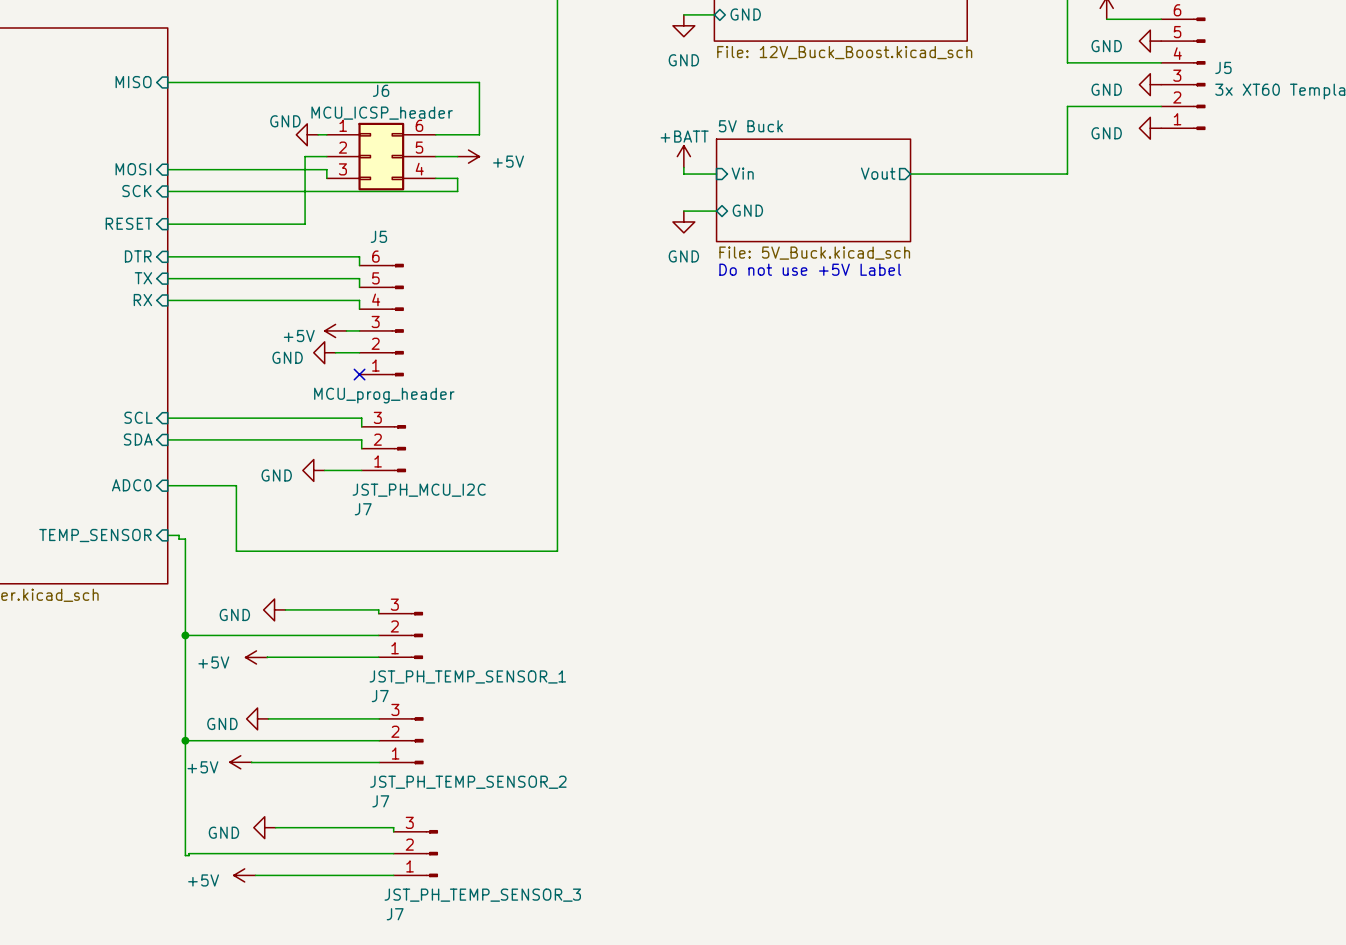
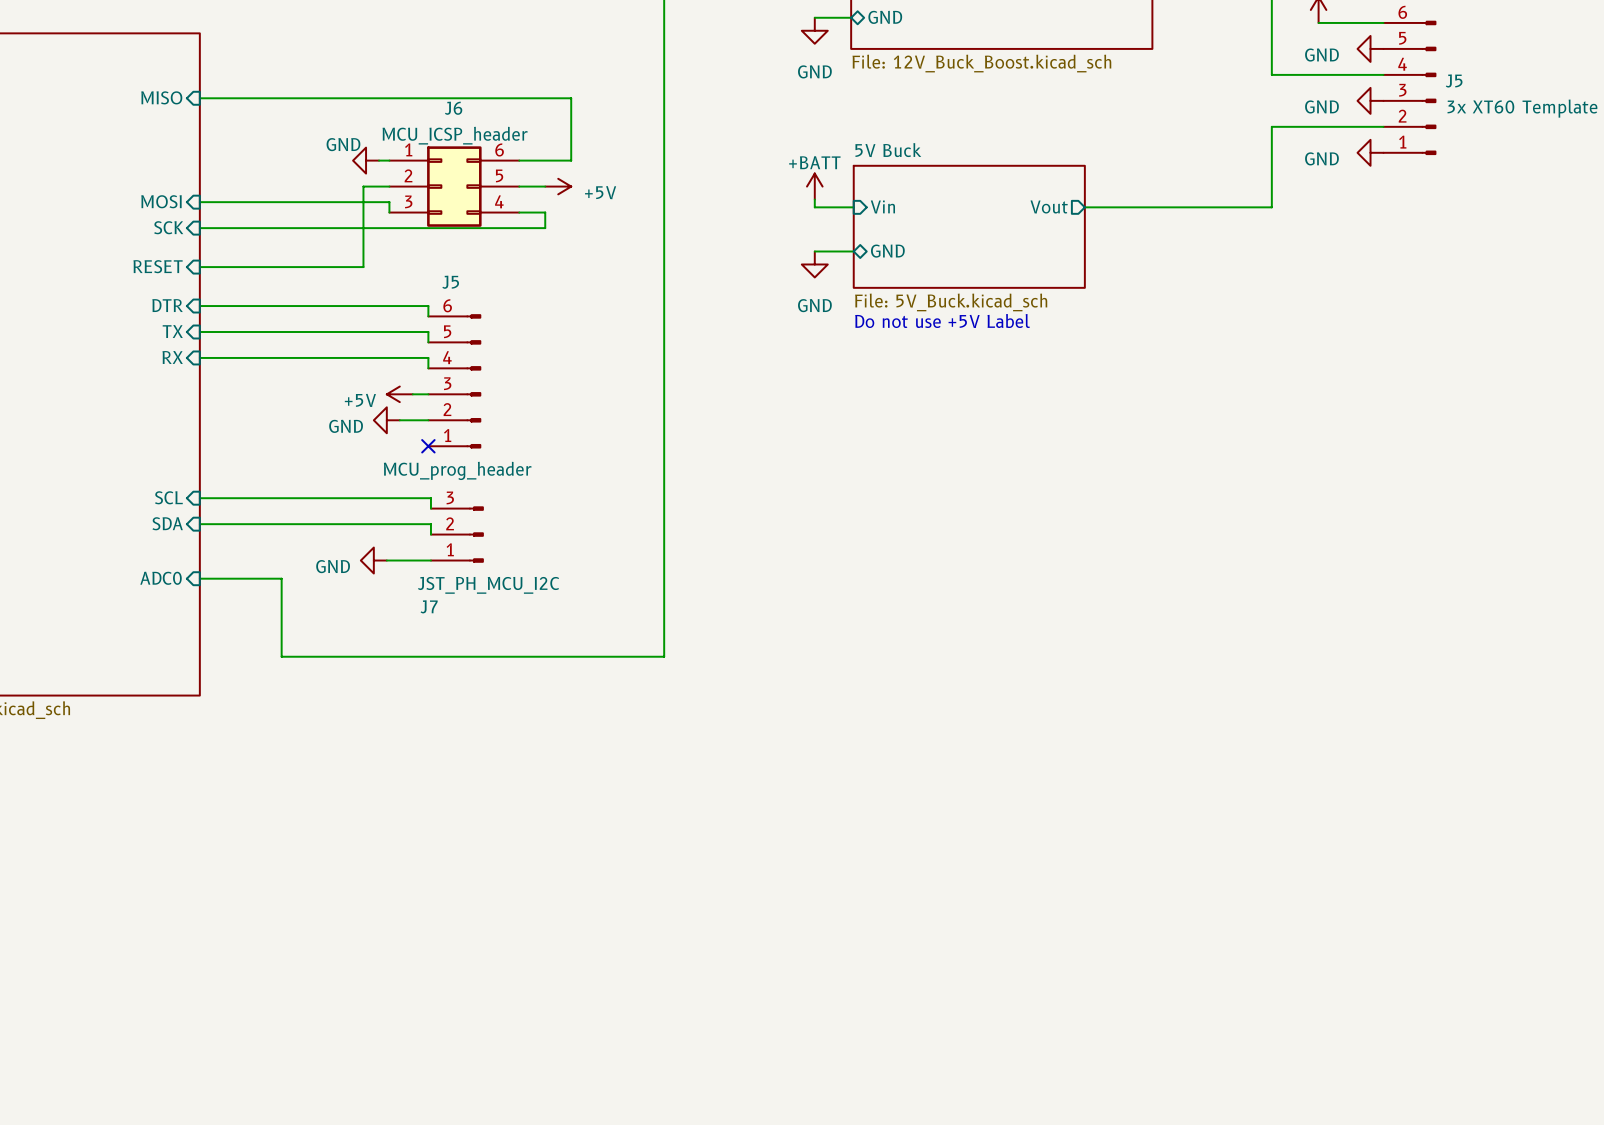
sheet pin: TEMP_SENSOR (95, 535) -> none
wire: (167, 535) (179, 535) (179, 539) (185, 539) (185, 855) (189, 855) (189, 853) (393, 853) -> none
power symbol: GND (274, 609) -> none
wire: (285, 609) (378, 609) (378, 613) -> none
wire: (185, 635) (378, 635) -> none
junction: (185, 635) -> none
J7: JST_PH_TEMP_SENSOR_1 (400, 635) -> none
power symbol: +5V (256, 657) -> none
wire: (378, 657) (267, 657) -> none
power symbol: GND (257, 718) -> none
wire: (268, 718) (379, 718) -> none
wire: (185, 740) (379, 740) -> none
junction: (185, 740) -> none
J7: JST_PH_TEMP_SENSOR_2 (401, 740) -> none
power symbol: +5V (240, 762) -> none
wire: (251, 762) (379, 762) -> none
power symbol: GND (264, 827) -> none
wire: (275, 827) (393, 827) (393, 831) -> none
J7: JST_PH_TEMP_SENSOR_3 (415, 853) -> none
power symbol: +5V (244, 875) -> none
wire: (255, 875) (393, 875) -> none

